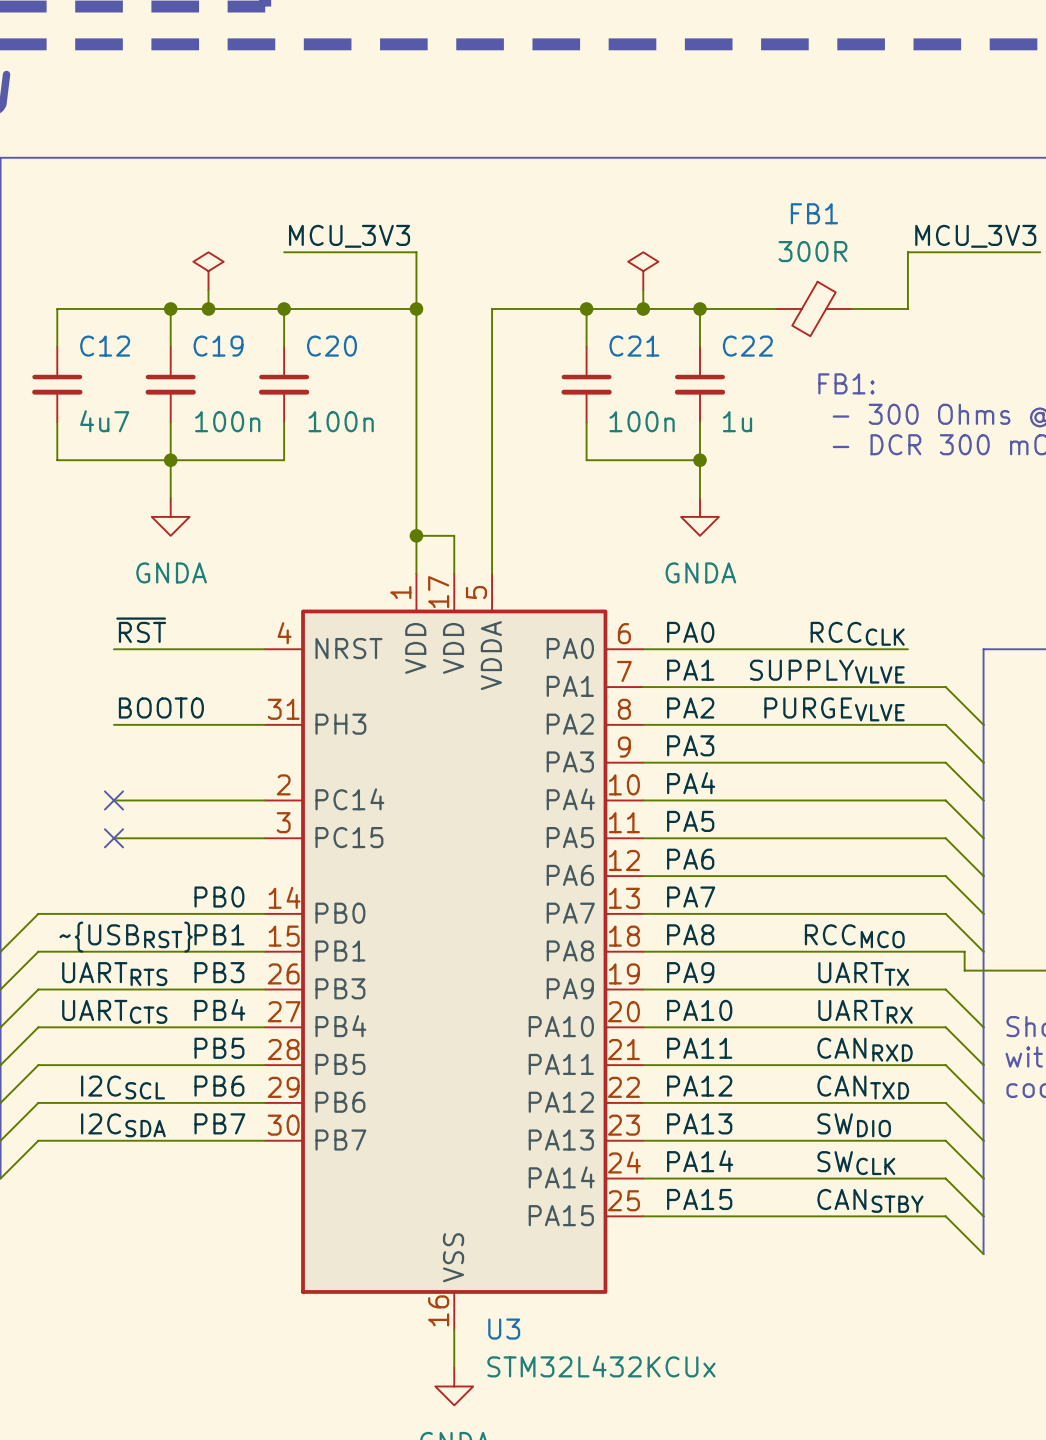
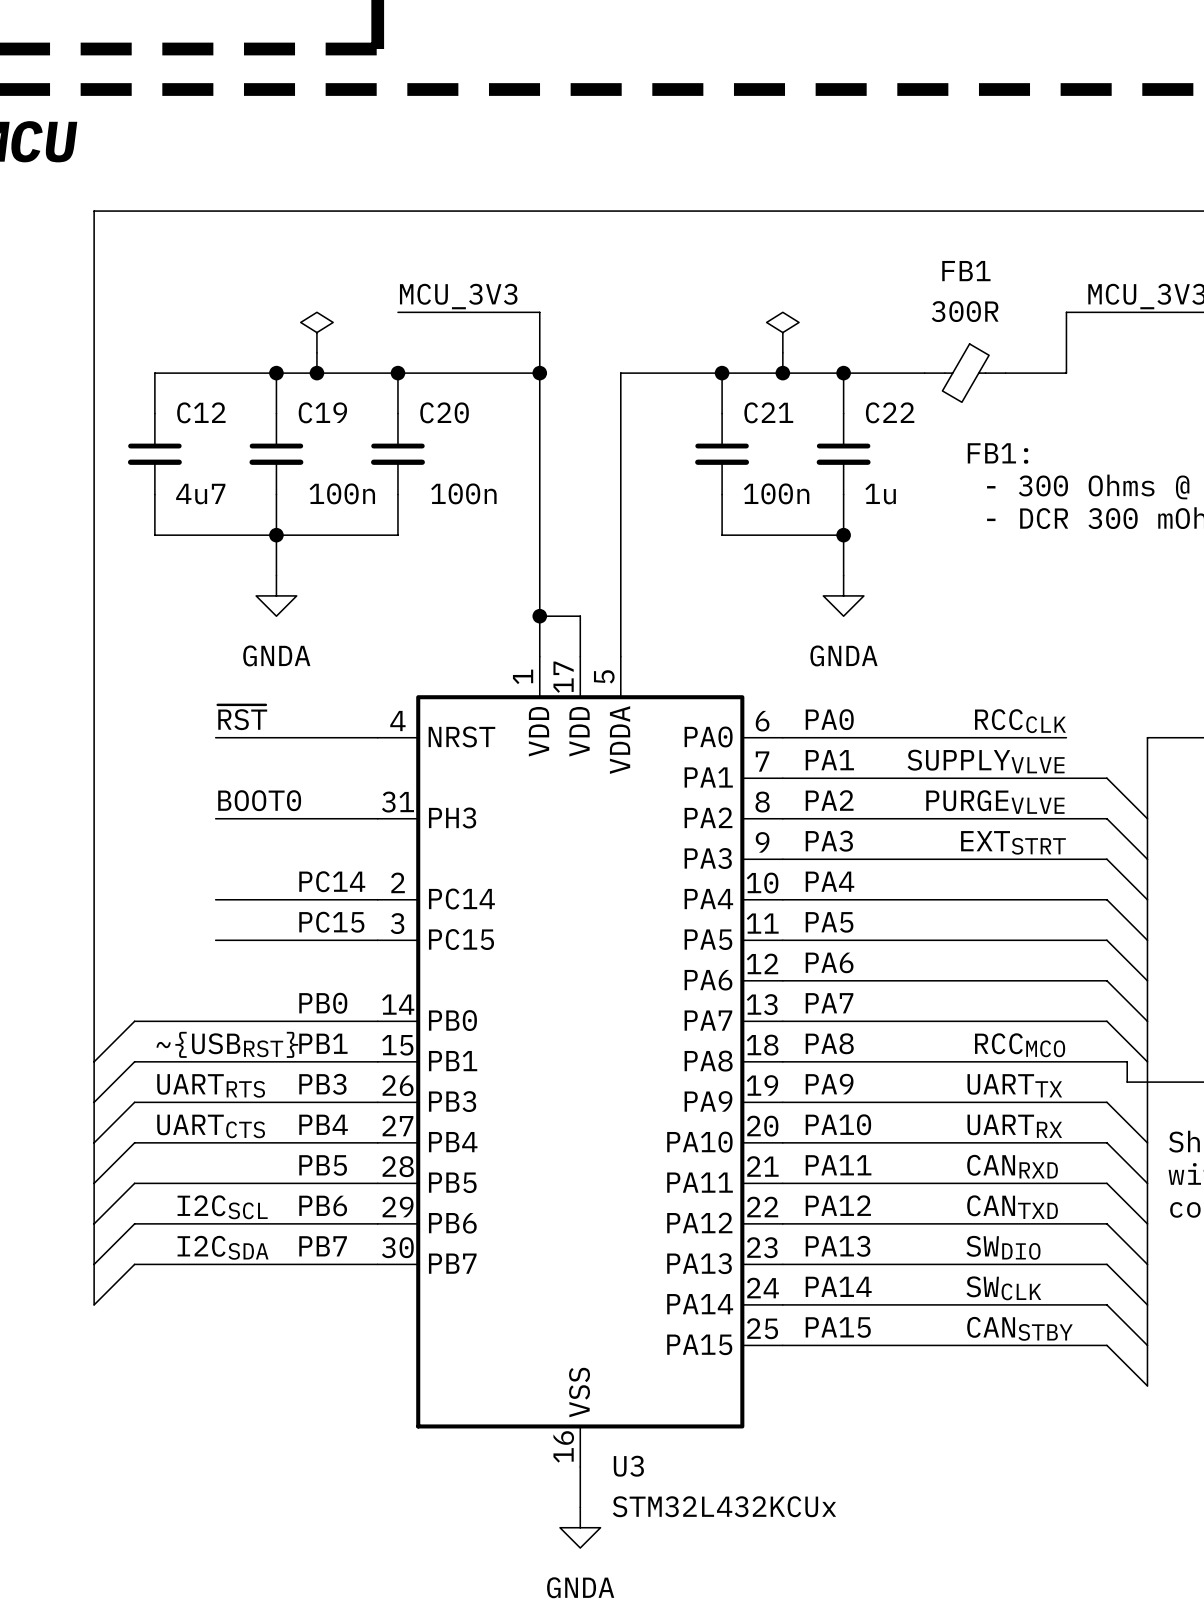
label: none -> EXTSTRT (1013, 842)
label: none -> PC14 (332, 881)
no-connect mark: (113, 800) -> none
label: none -> PC15 (331, 922)
no-connect mark: (113, 838) -> none

